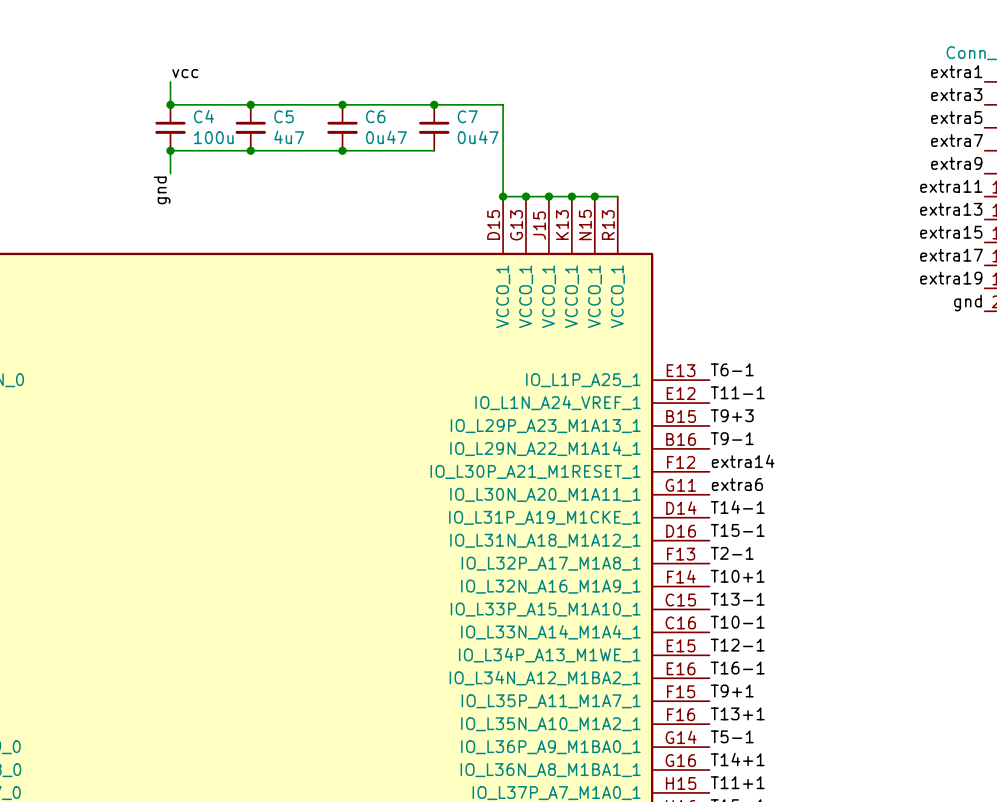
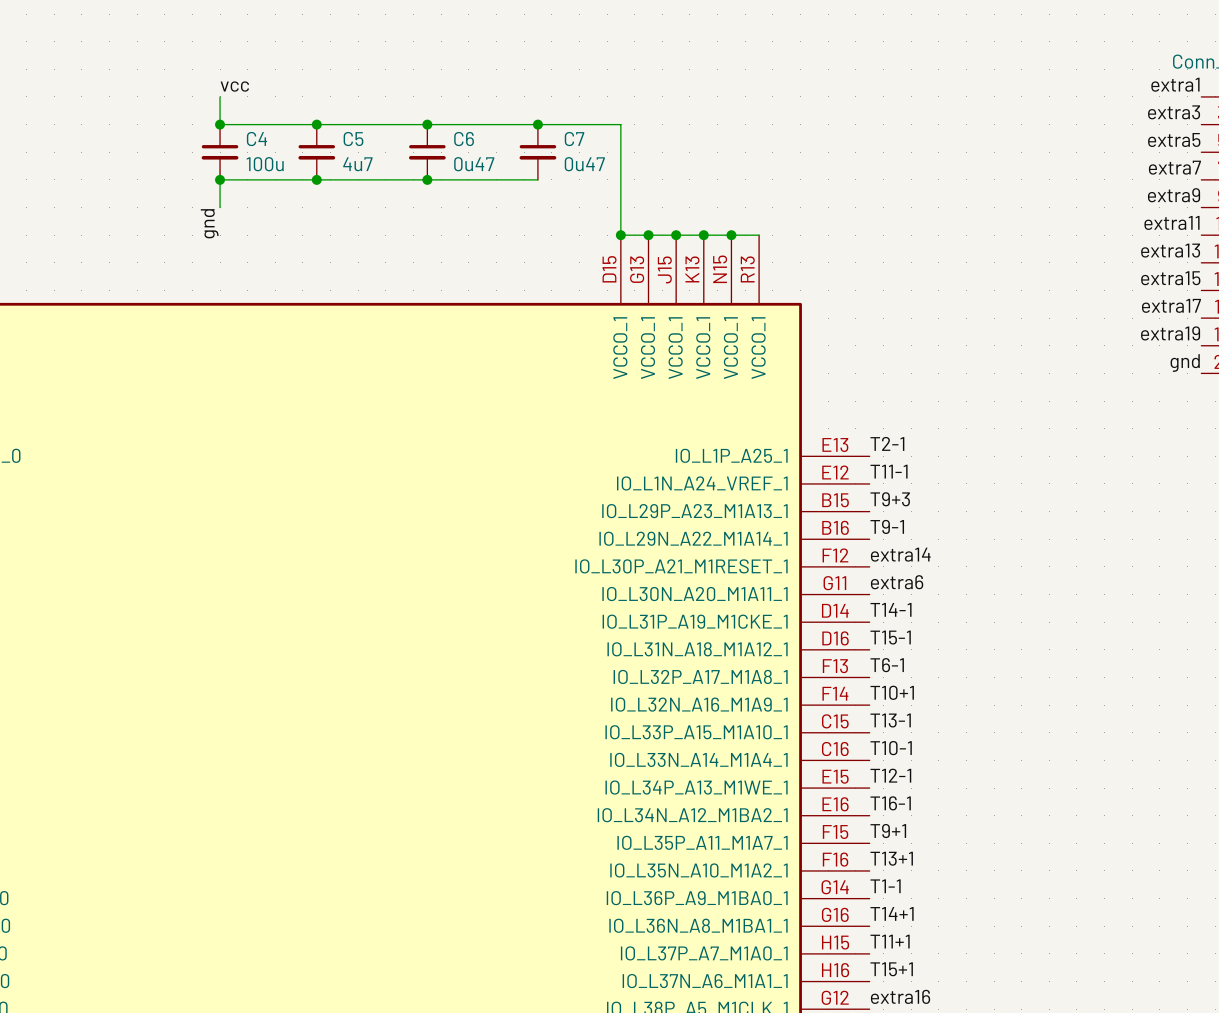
label: T6-1 (732, 369) -> T2-1 (887, 443)
label: T2-1 (732, 553) -> T6-1 (887, 665)
label: T5-1 (732, 736) -> T1-1 (885, 886)

